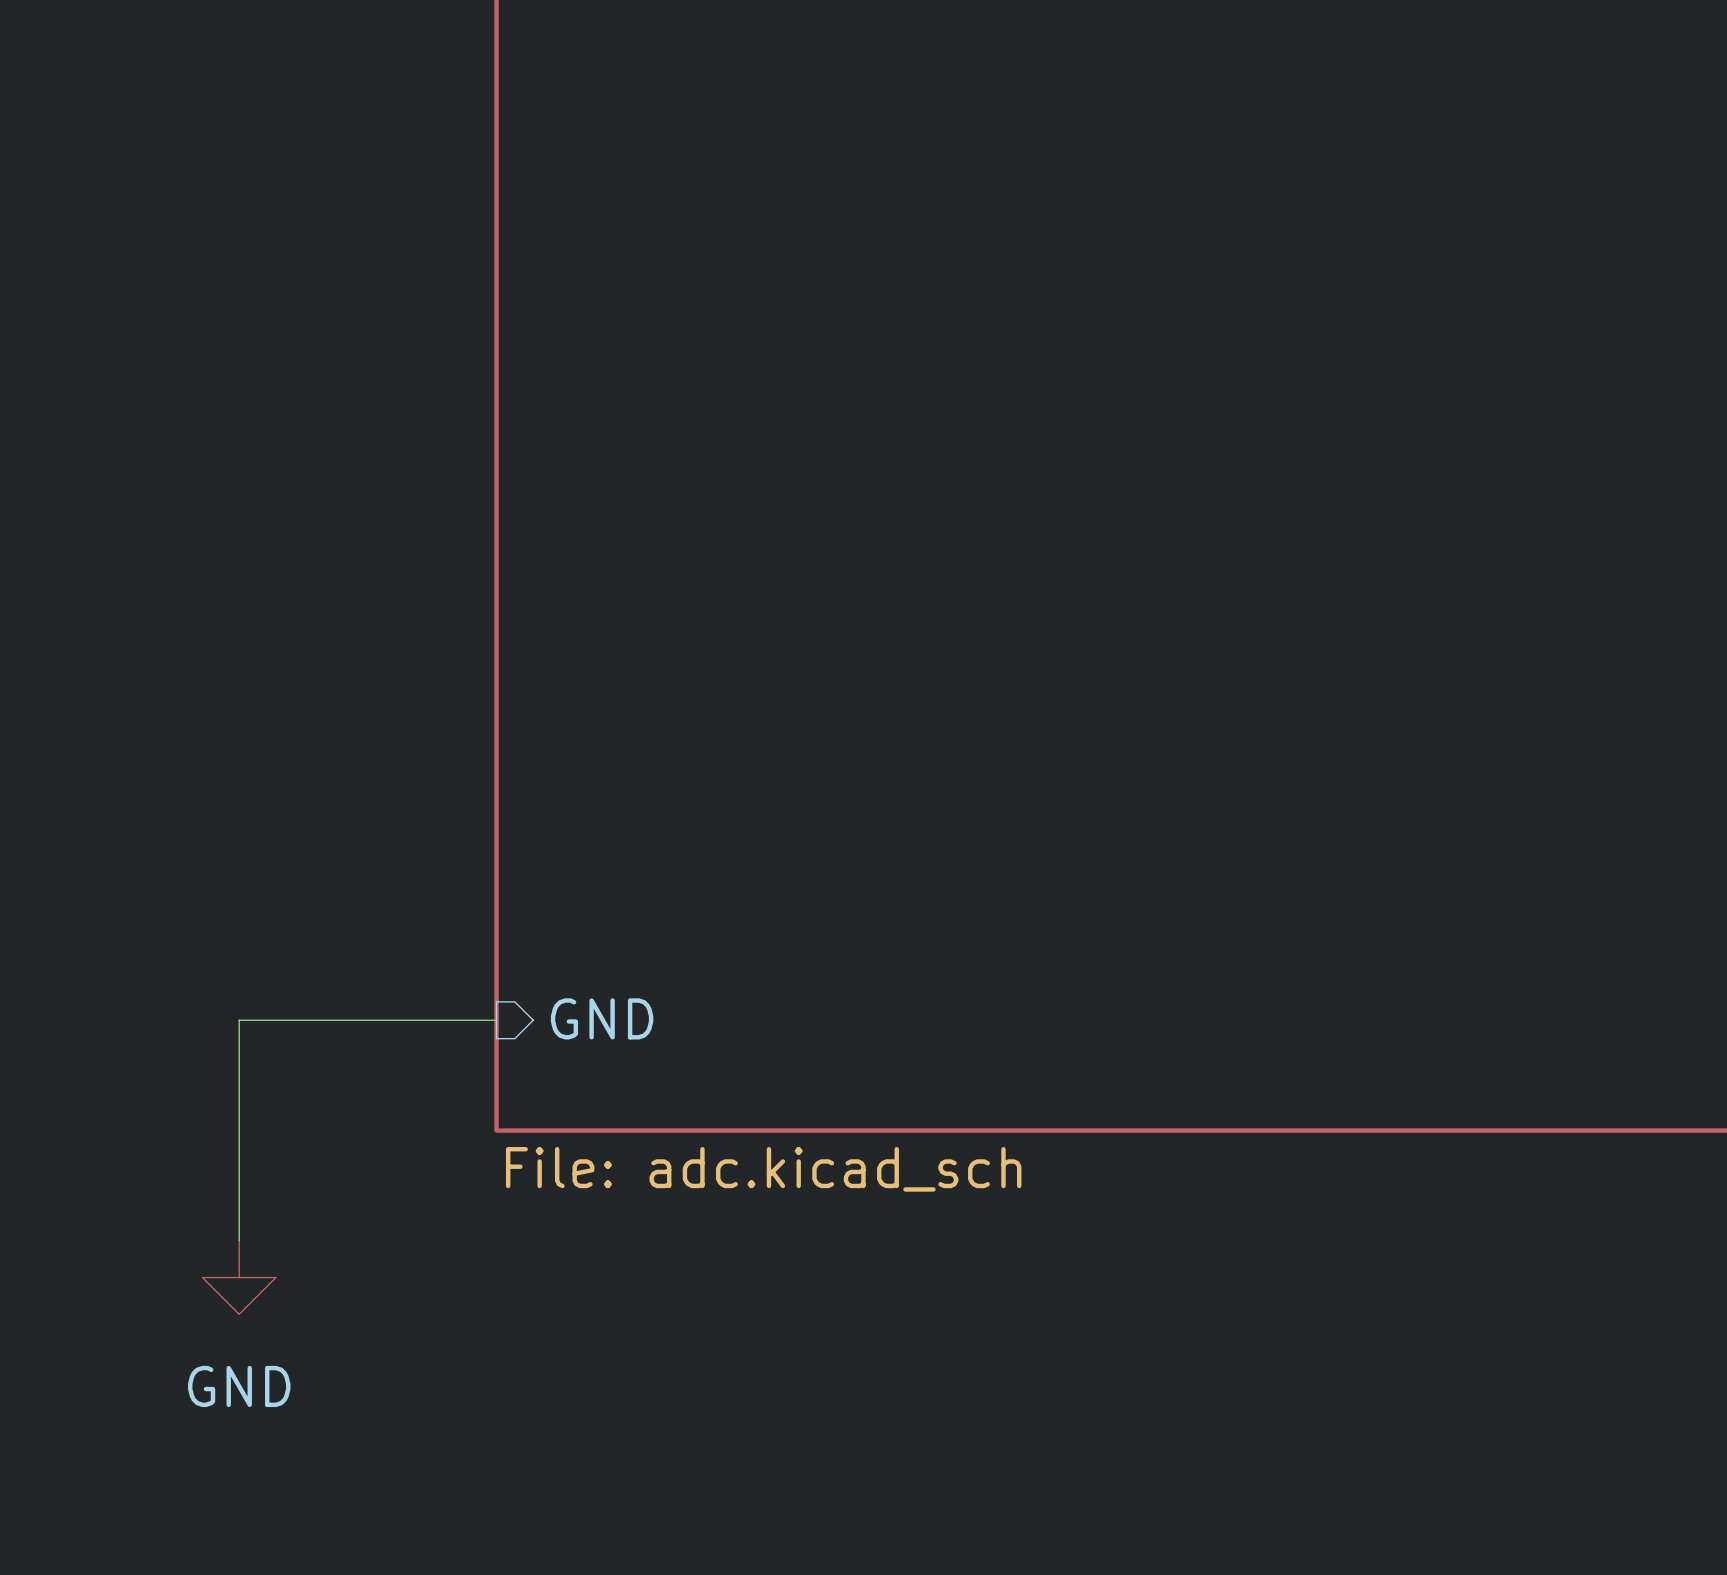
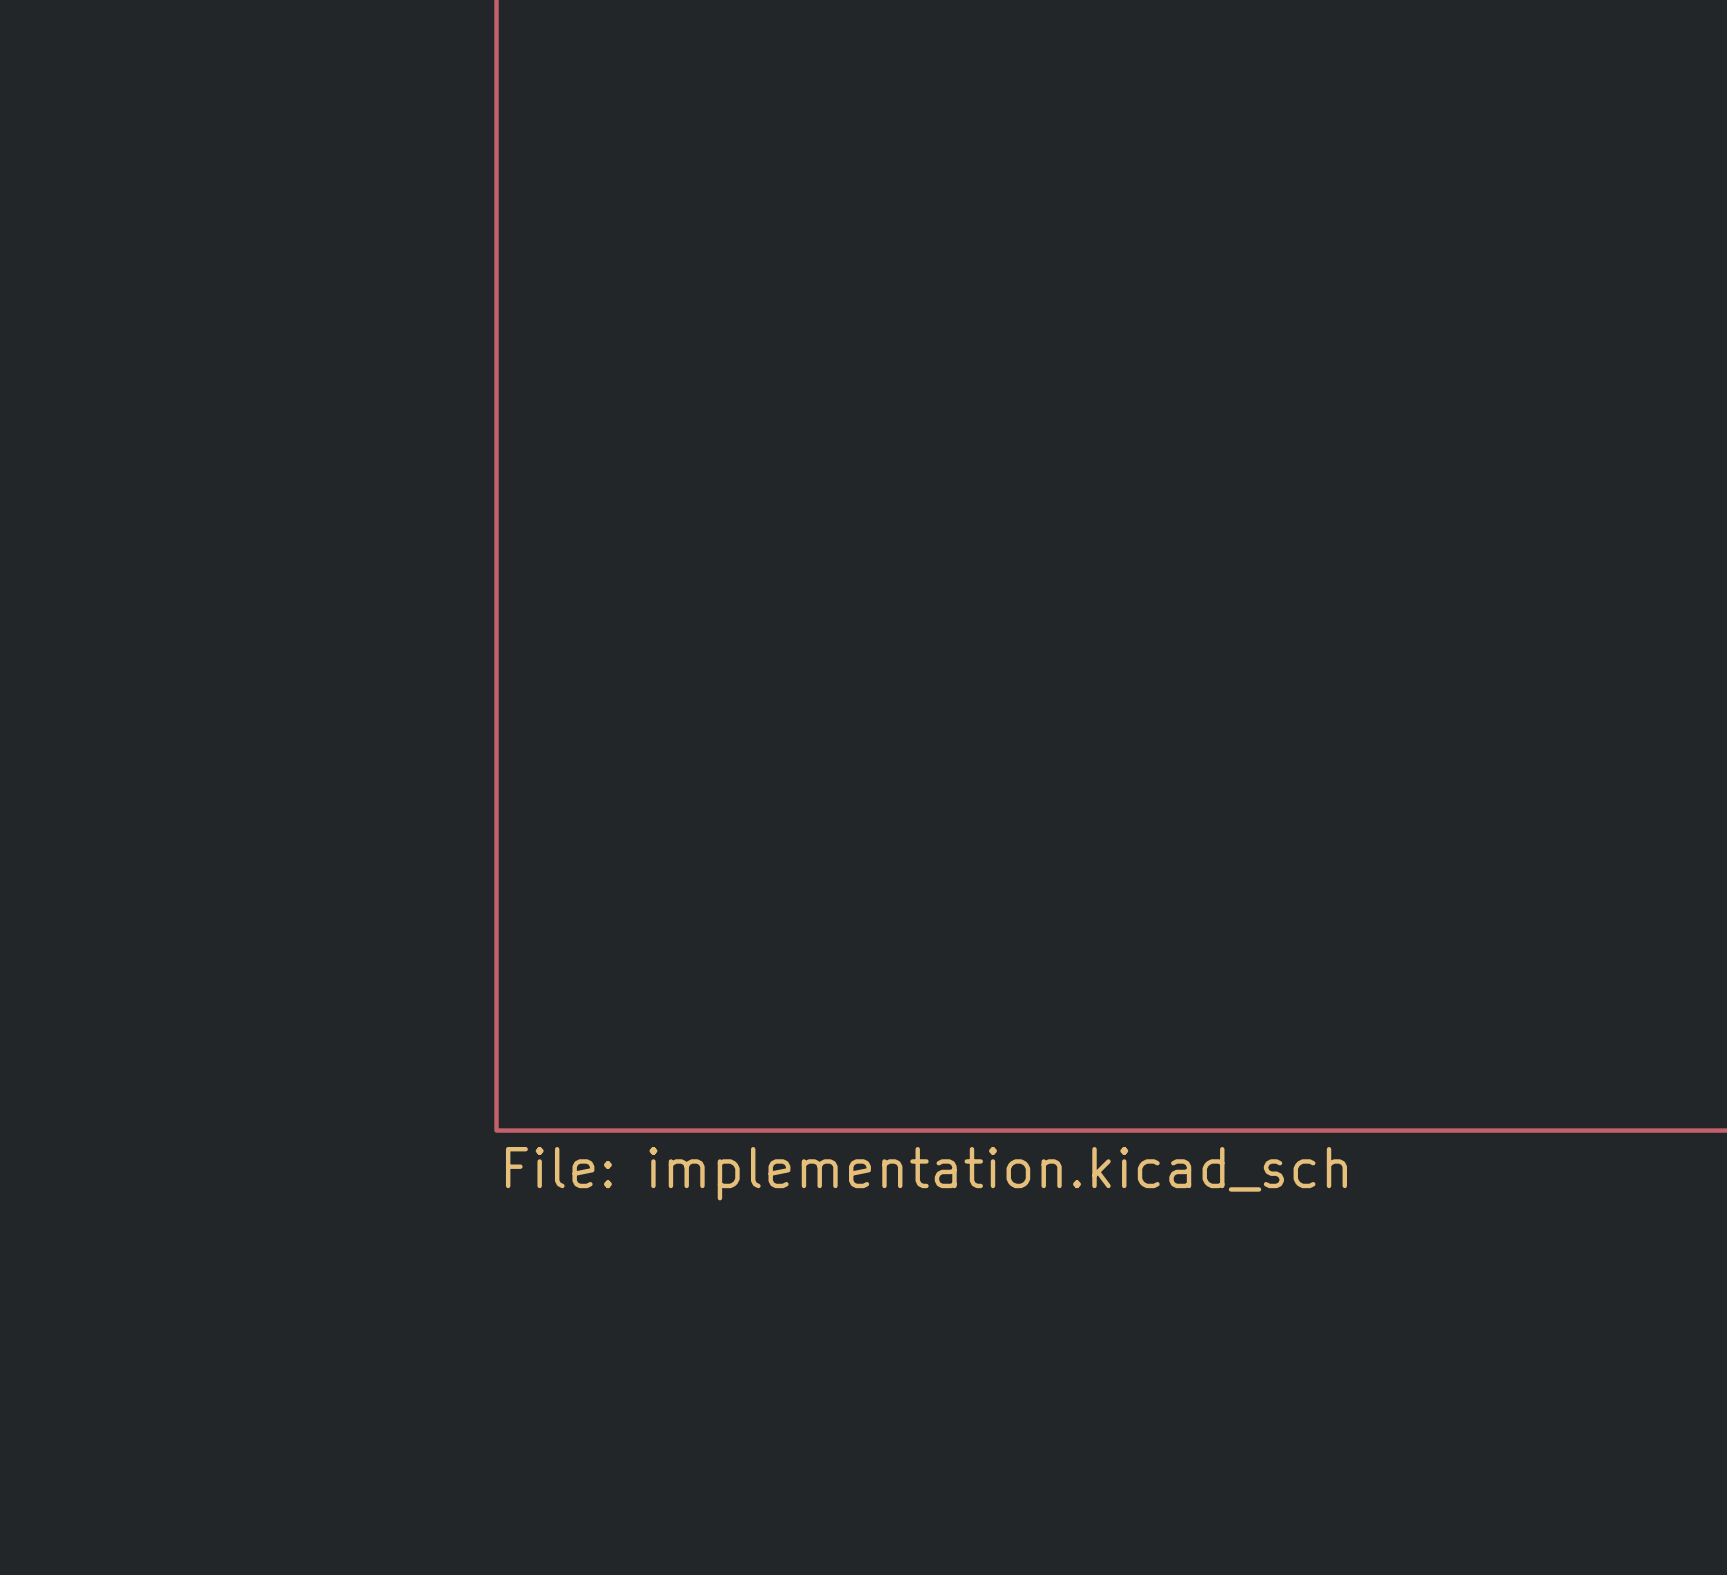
sheet pin: GND (602, 1018) -> none
wire: (496, 1020) (239, 1020) (239, 1240) -> none
sheet value: File: adc.kicad_sch (763, 1169) -> File: implementation.kicad_sch (926, 1173)
power symbol: GND (239, 1277) -> none

